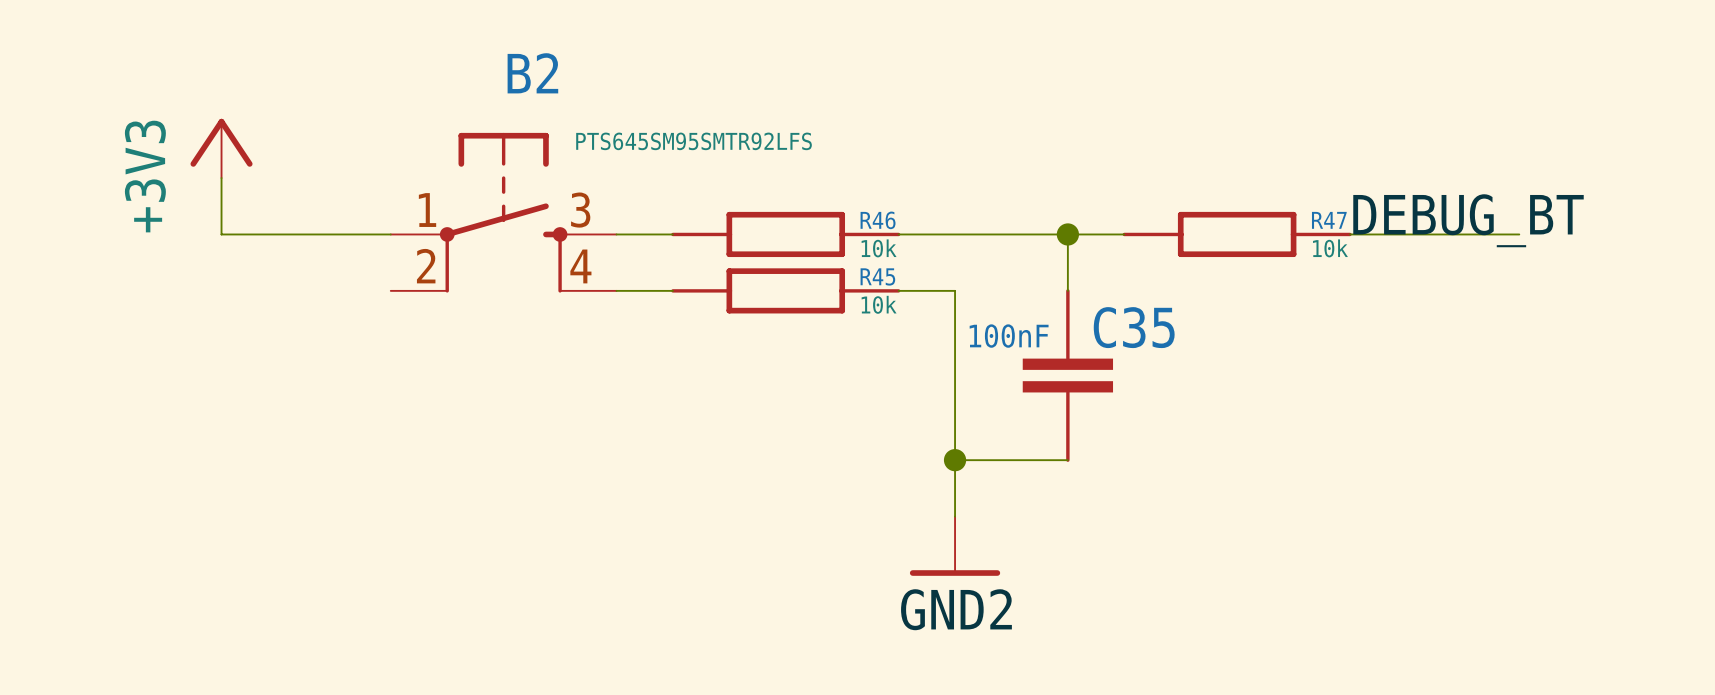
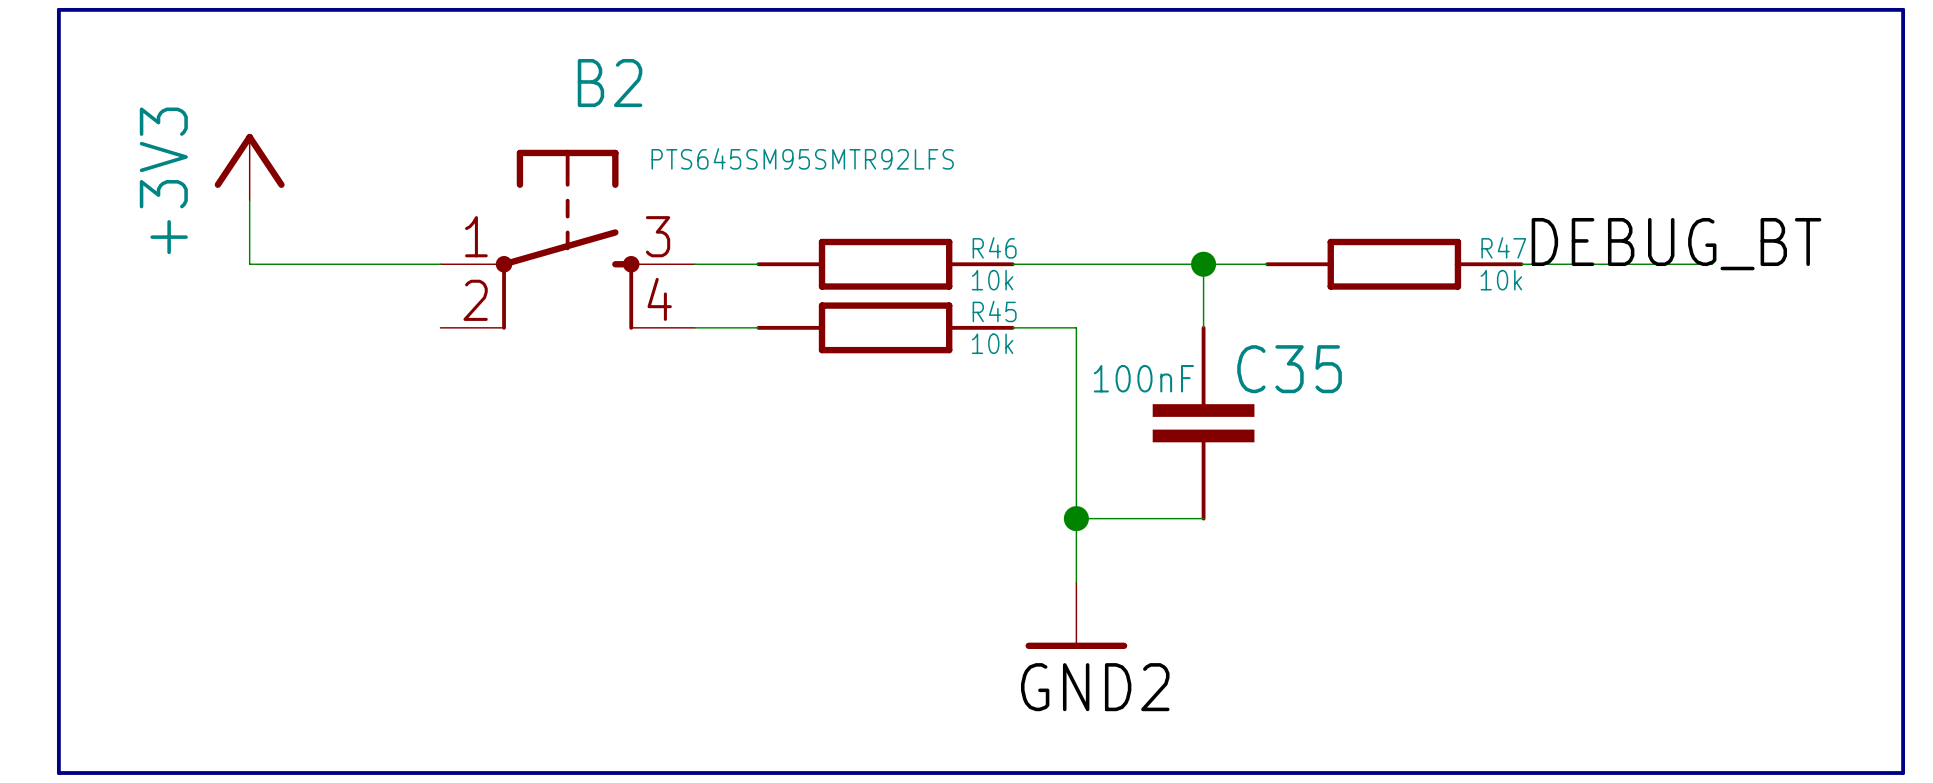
line: none -> (58, 9) (58, 773) (1903, 773) (1903, 9) (58, 9)

